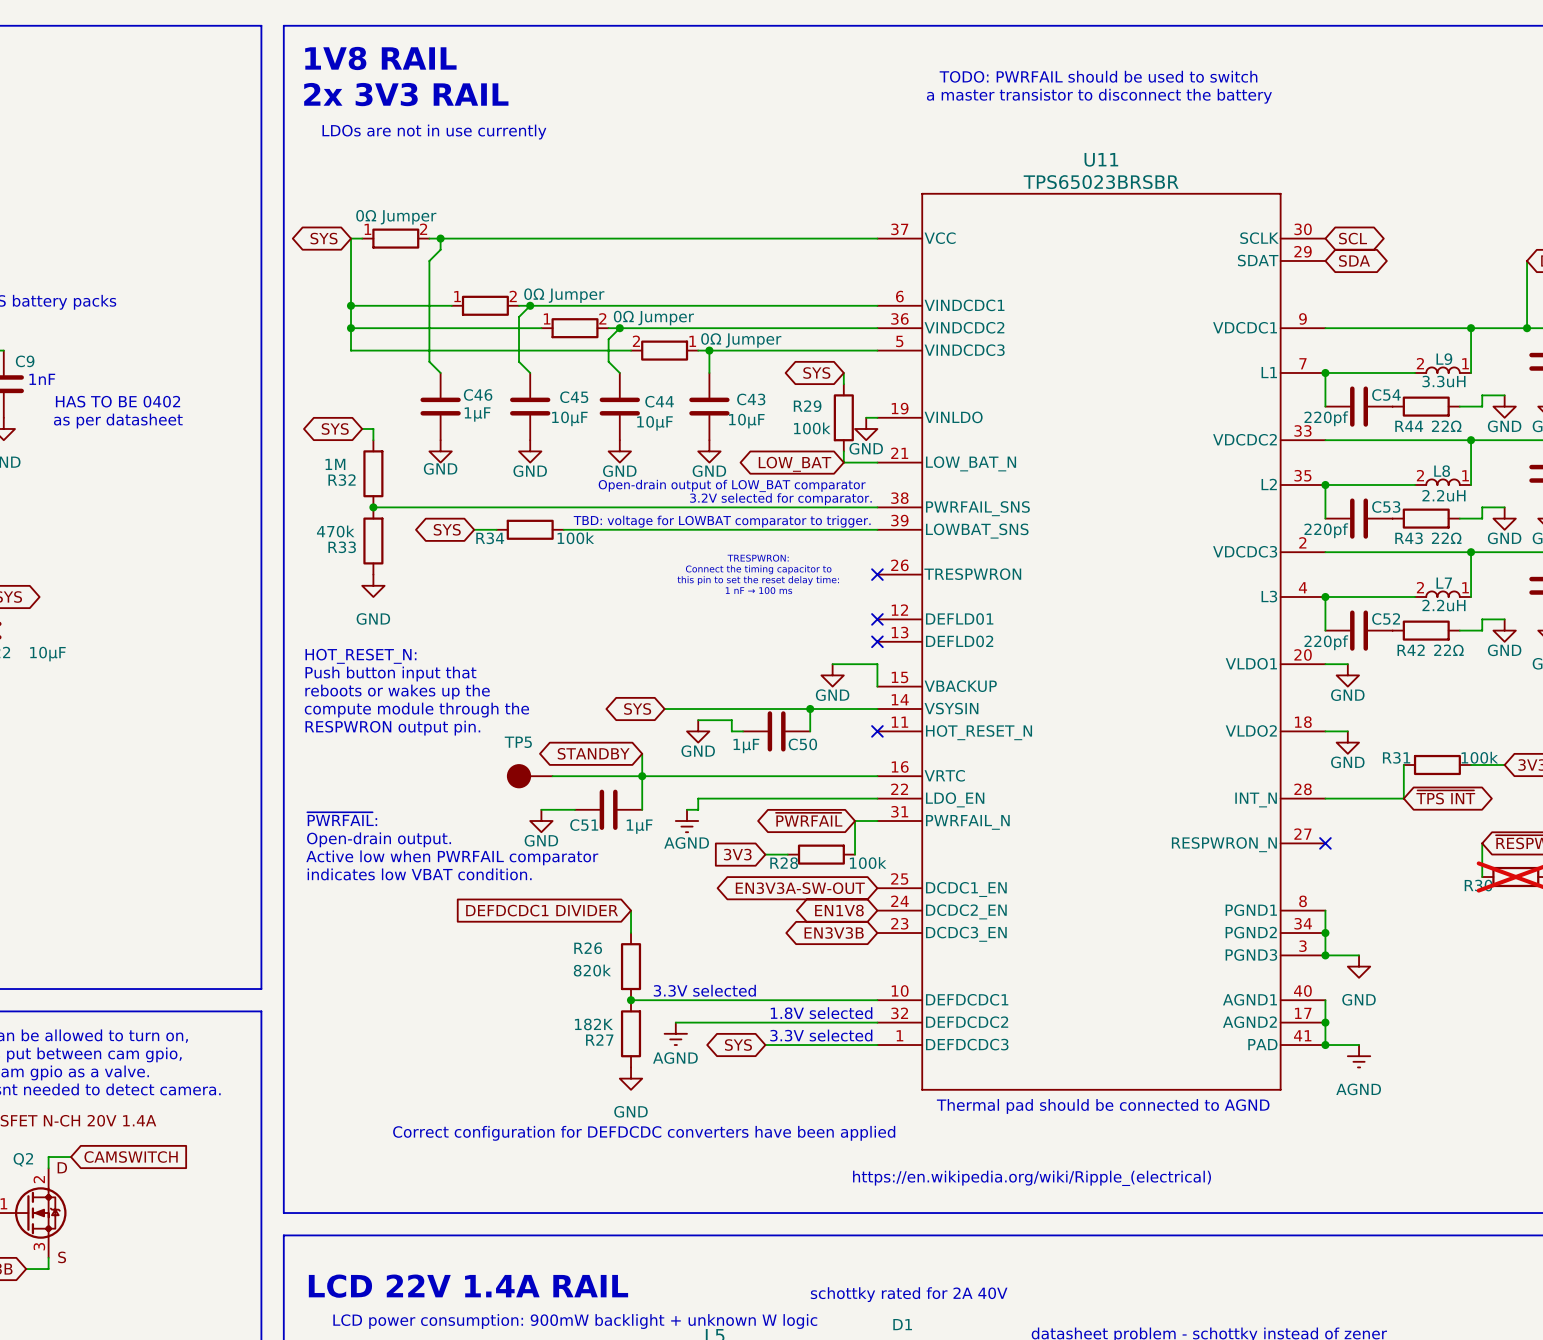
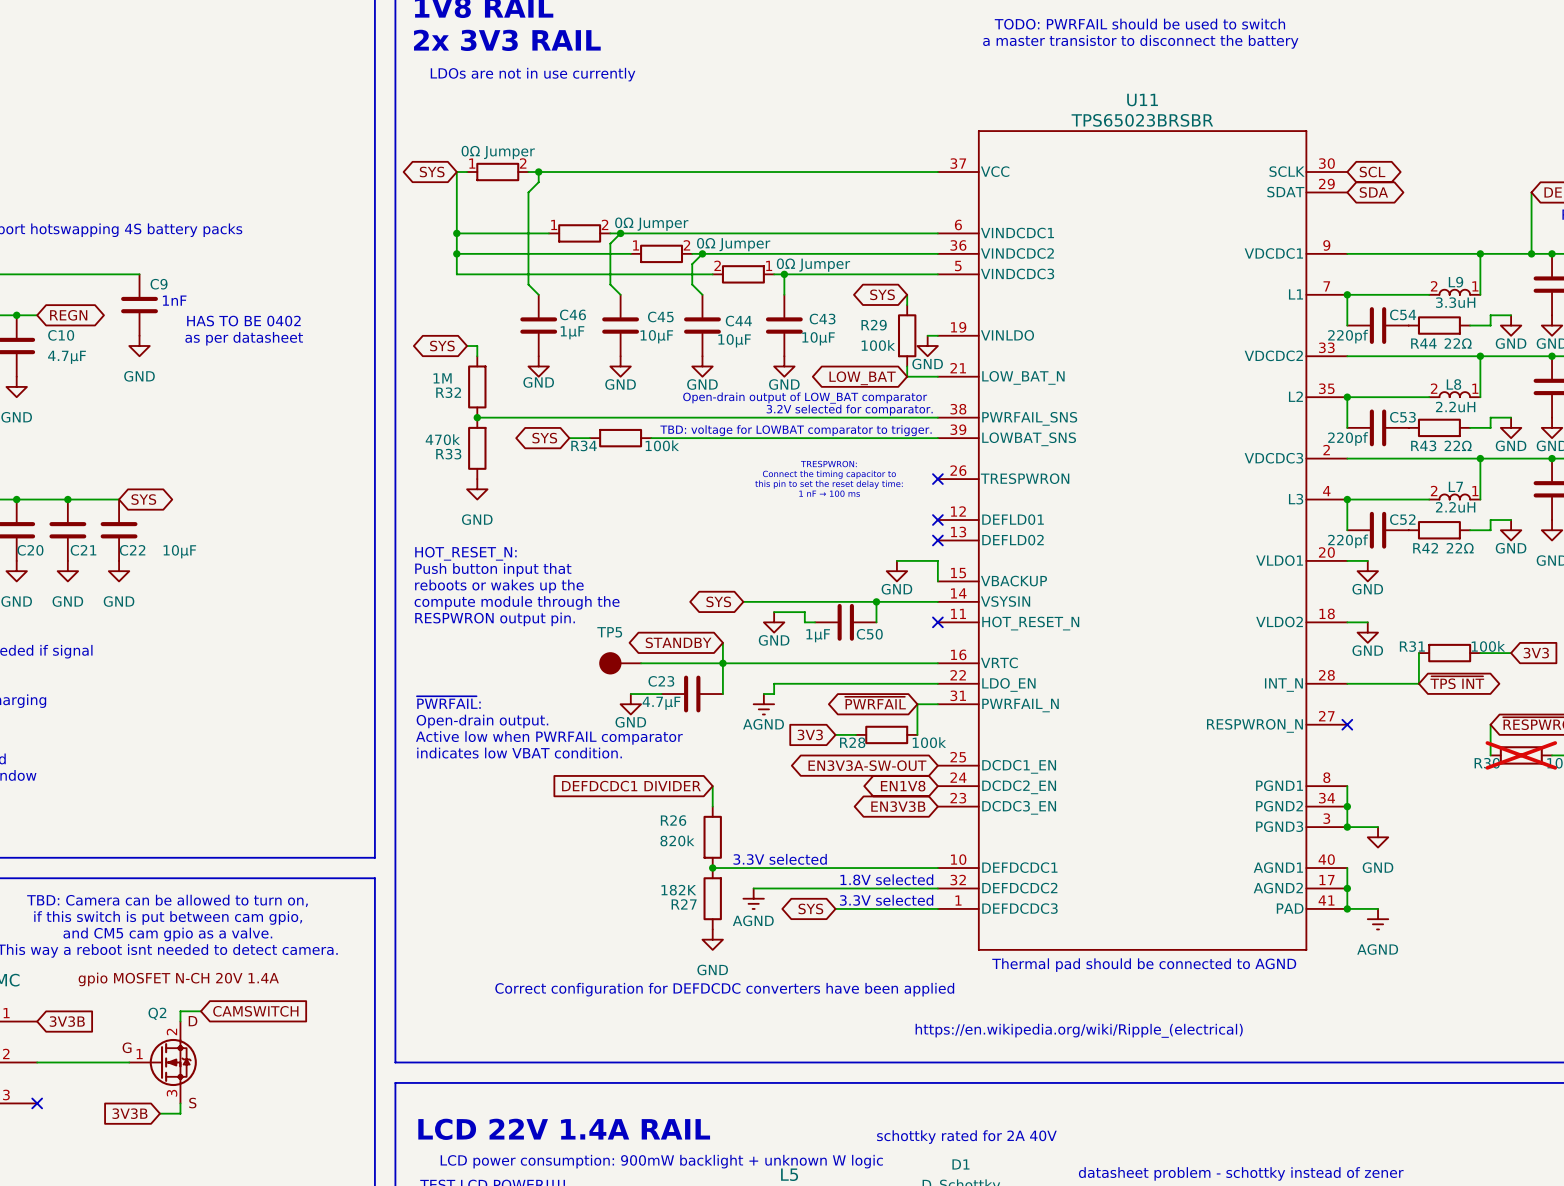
C51 name: C51 (584, 825) -> C23 (661, 681)
C51 value: 1μF (639, 826) -> 4.7μF (661, 703)

